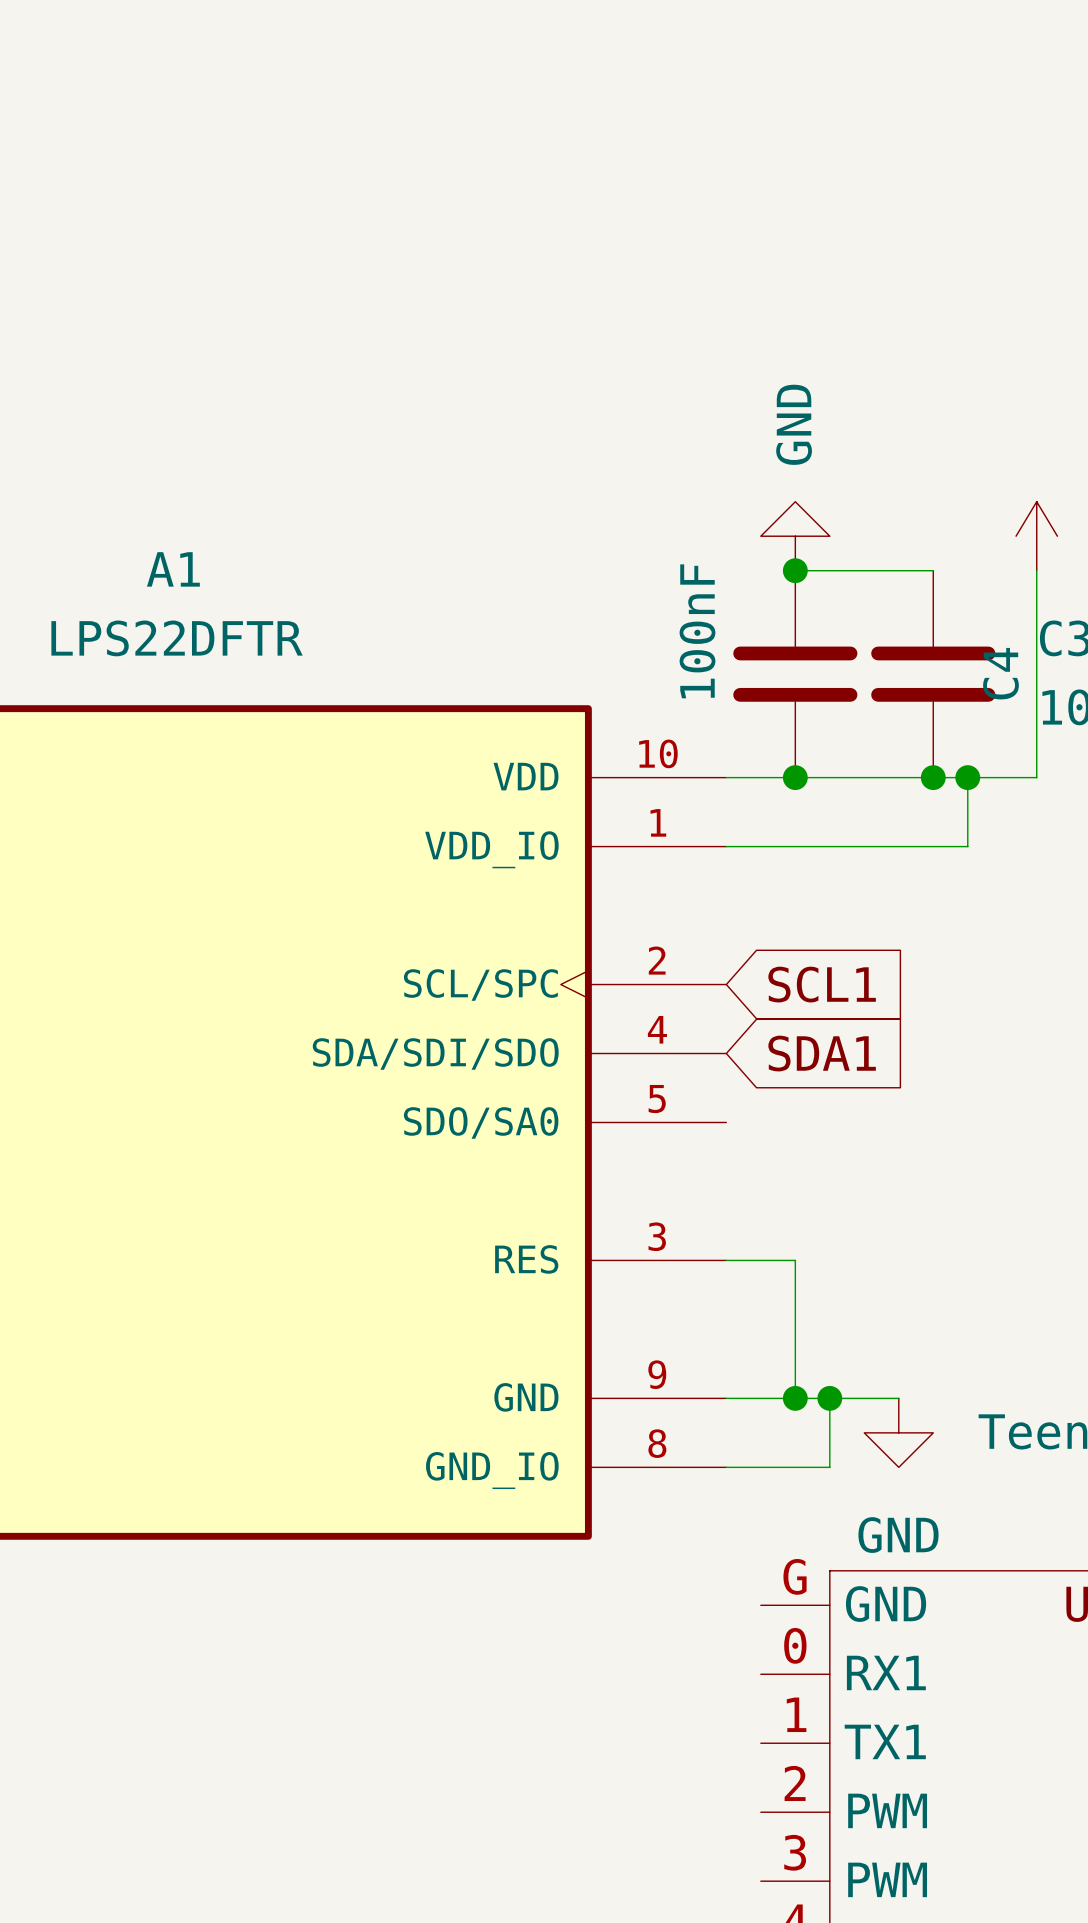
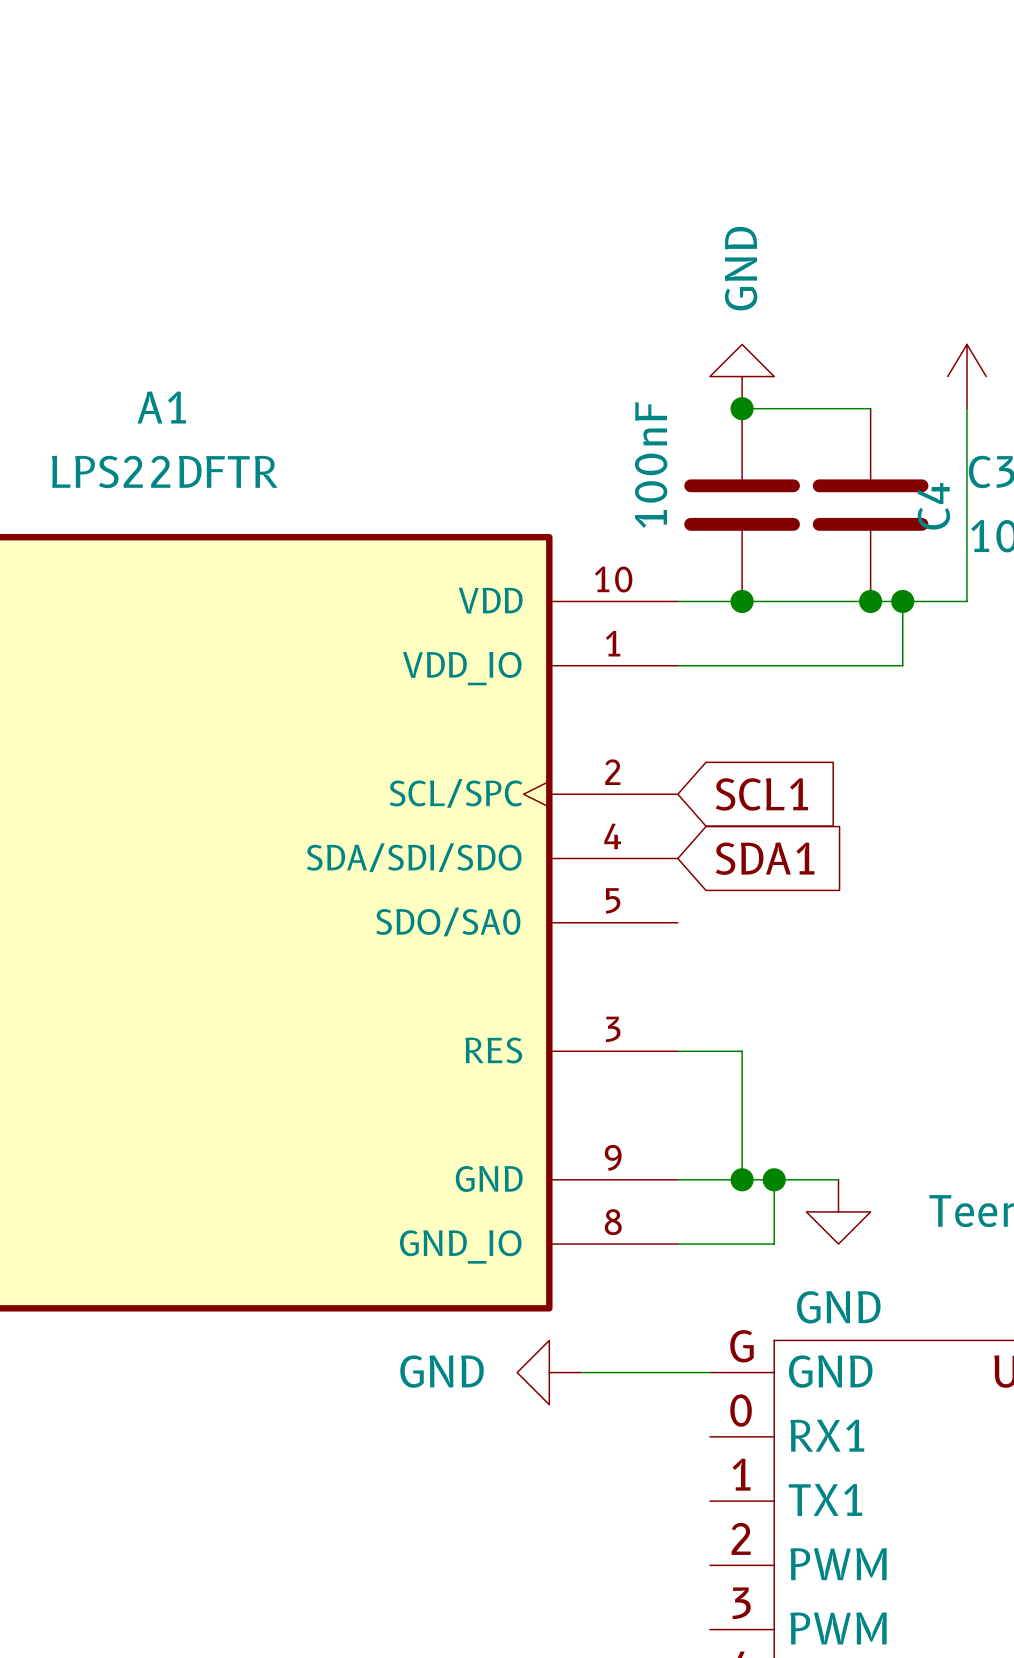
power symbol: none -> GND (549, 1372)
wire: none -> (581, 1372) (709, 1372)

